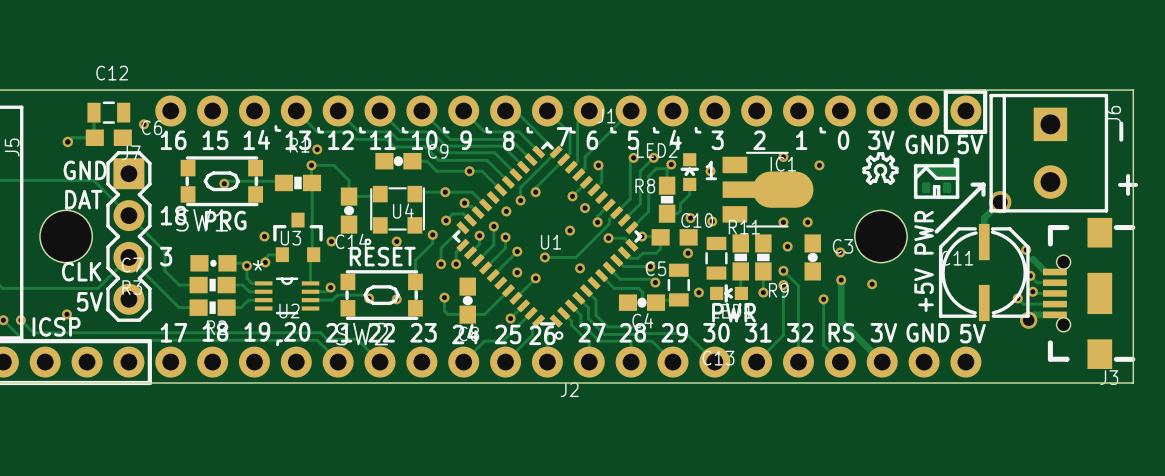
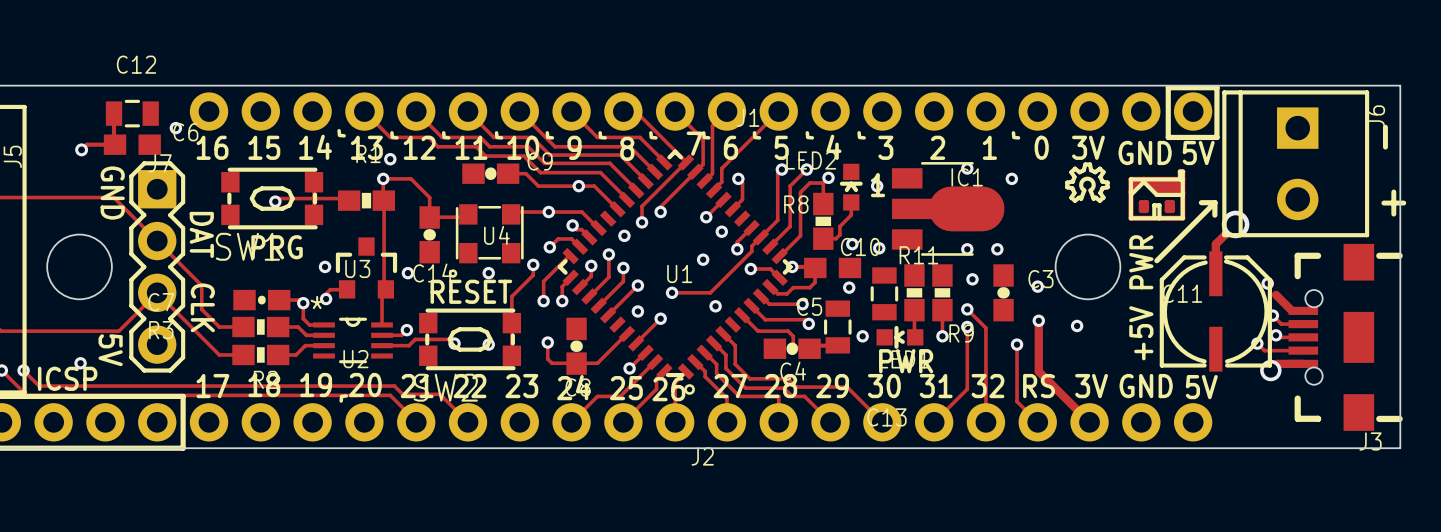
text rotation: 0° (85, 170) -> 90° clockwise (112, 193)
text rotation: 0° (83, 199) -> 90° clockwise (201, 234)
text position: DAT (83, 199) -> DAT (201, 234)
text: 18 (173, 215) -> none
text: 3 (166, 256) -> none
text rotation: 0° (81, 271) -> 90° clockwise (202, 307)
text position: CLK (81, 271) -> CLK (202, 307)
text rotation: 0° (89, 301) -> 90° clockwise (110, 350)

